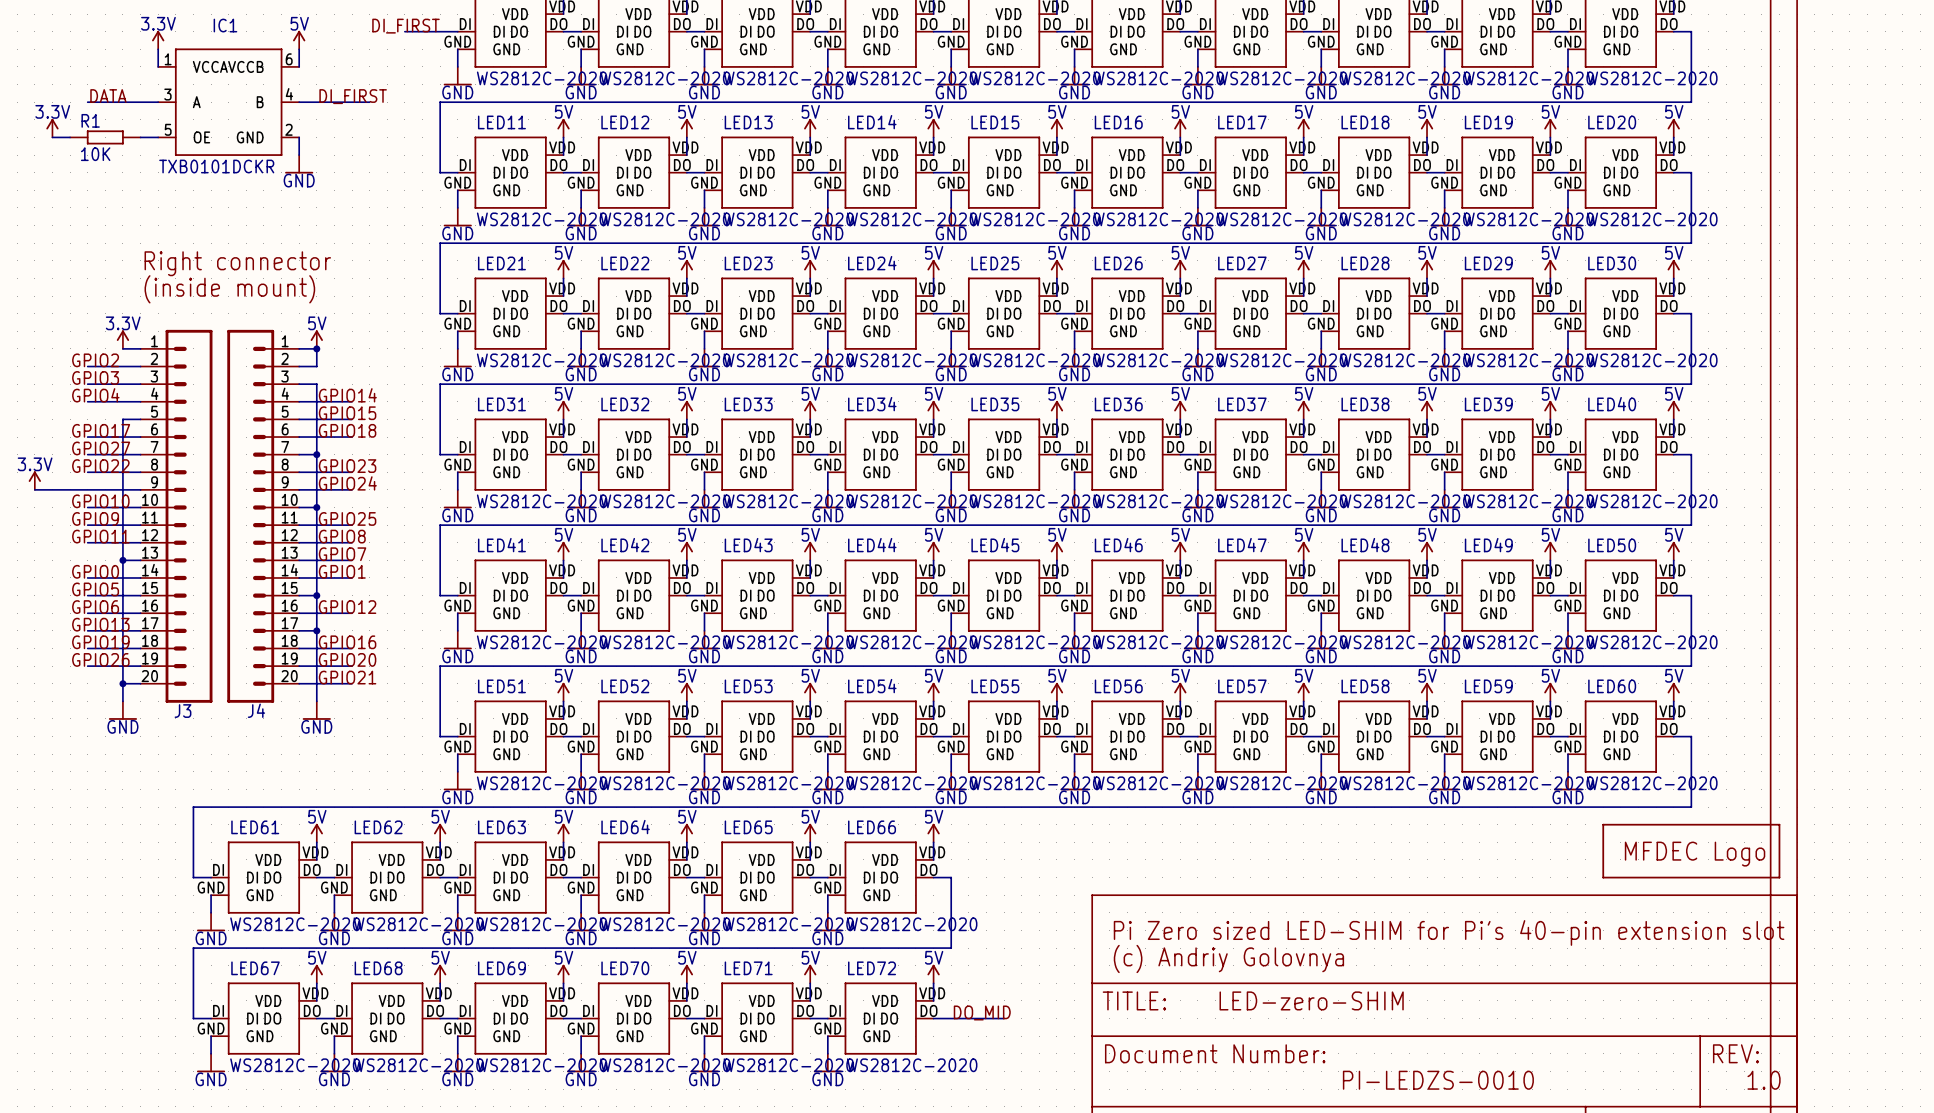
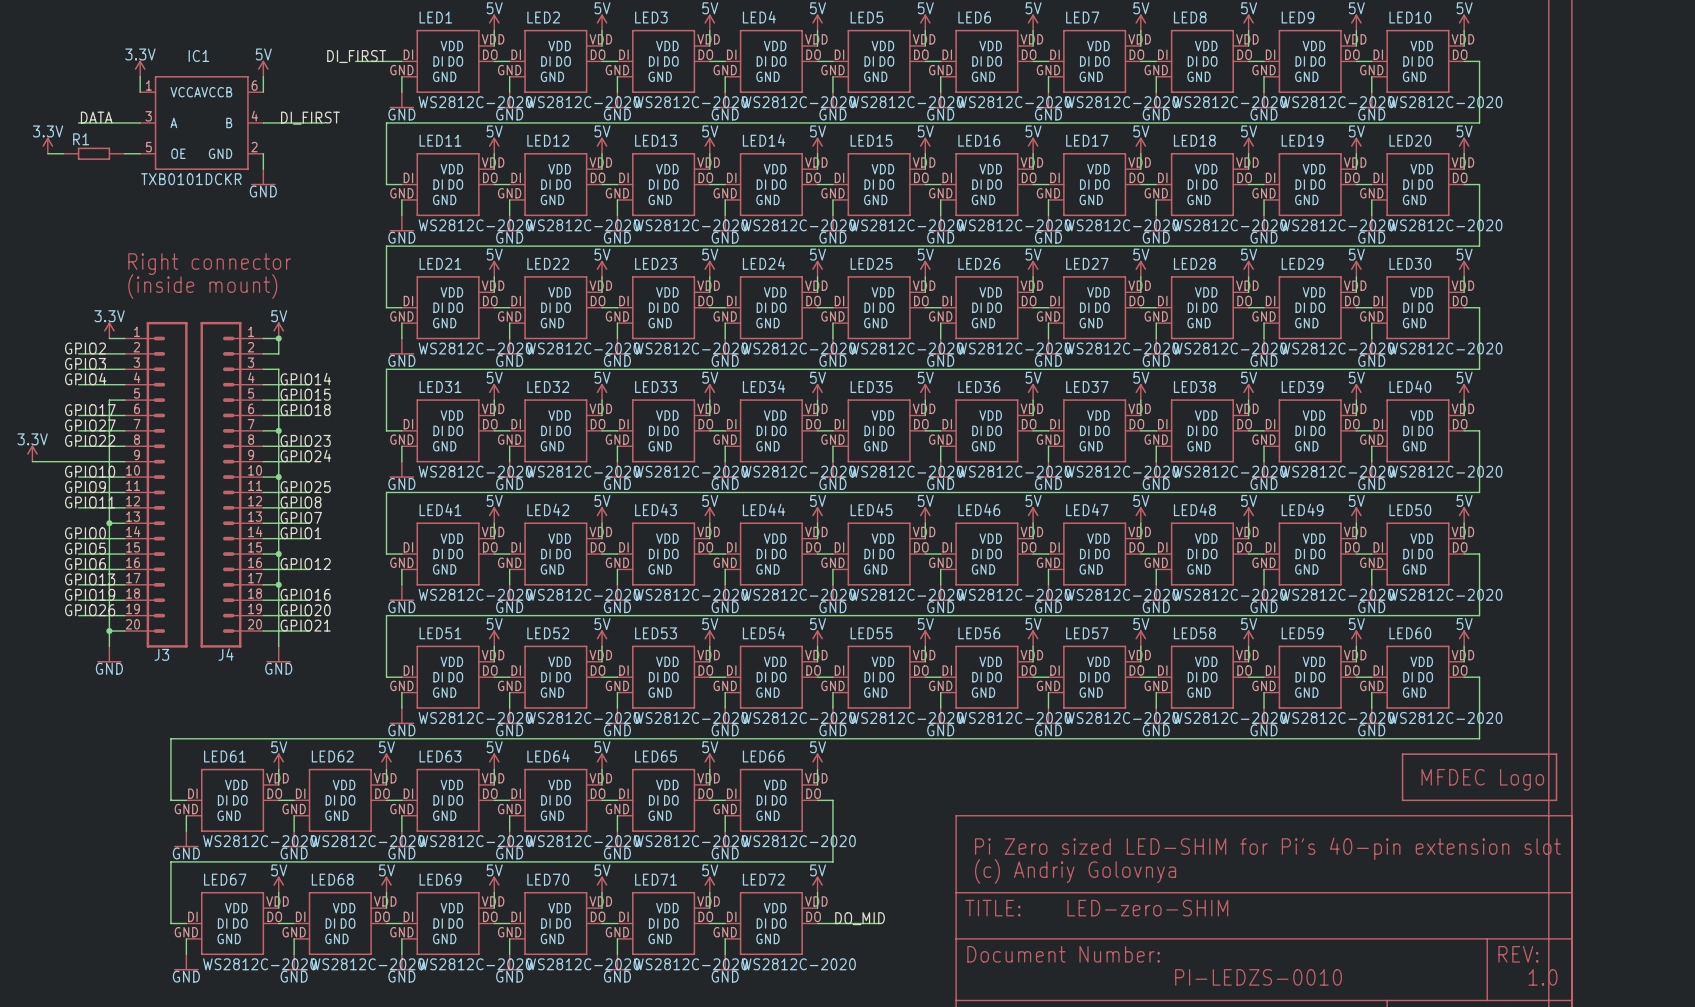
R1 value: 10K (95, 154) -> none

